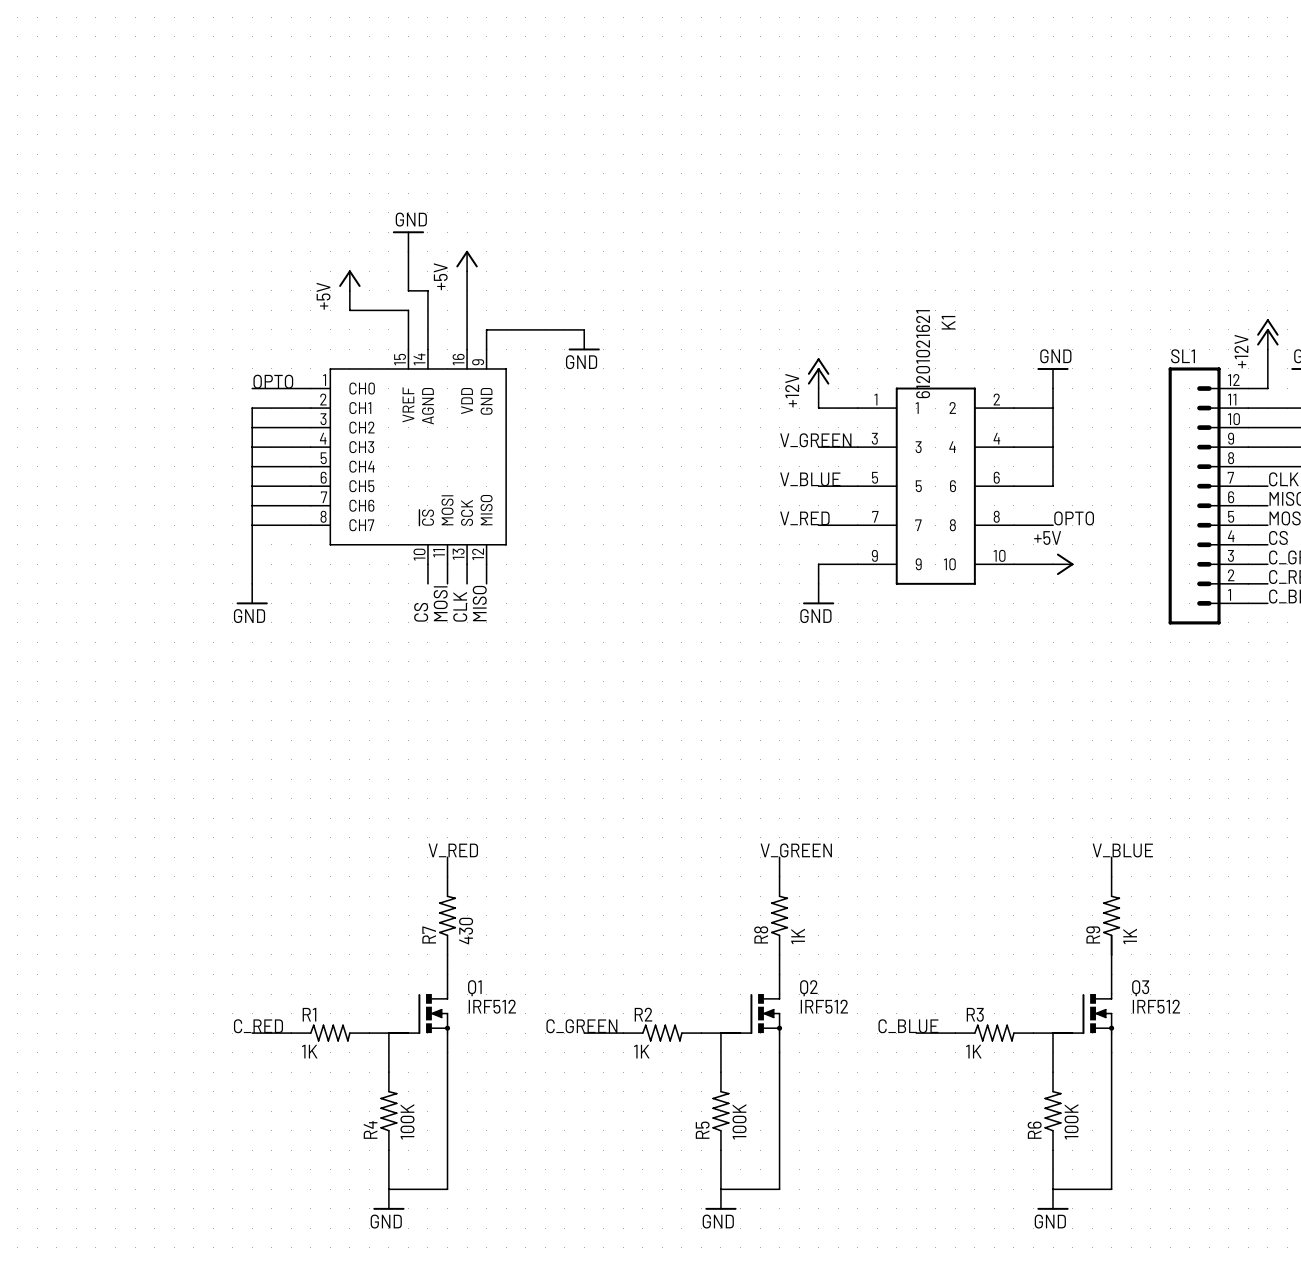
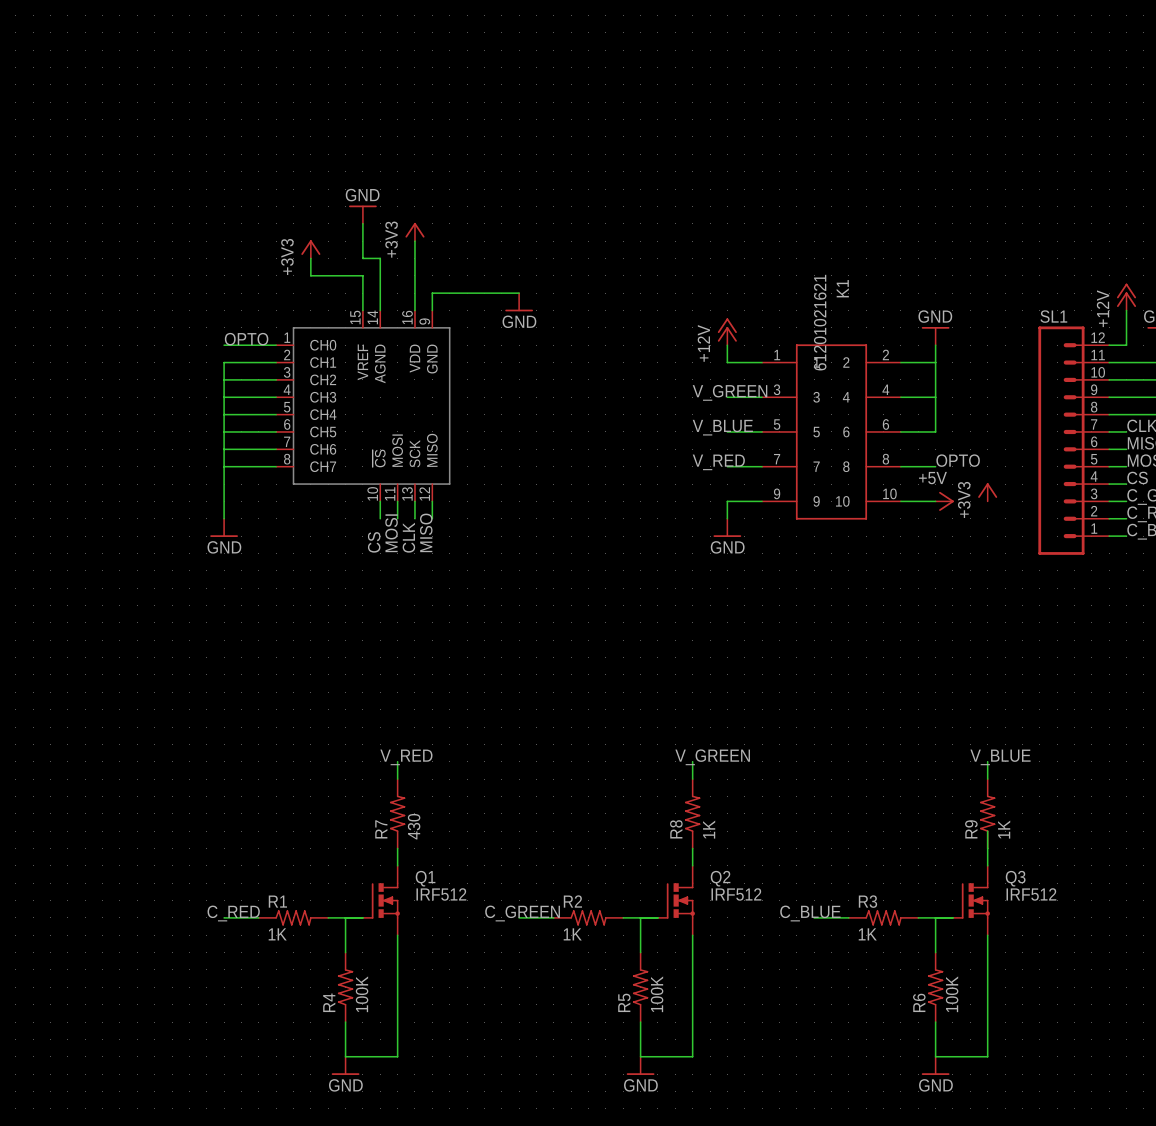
power symbol: +5V (467, 261) -> +3V3 (414, 231)
power symbol: +5V (349, 280) -> +3V3 (310, 249)
power symbol: none -> +3V3 (987, 492)

